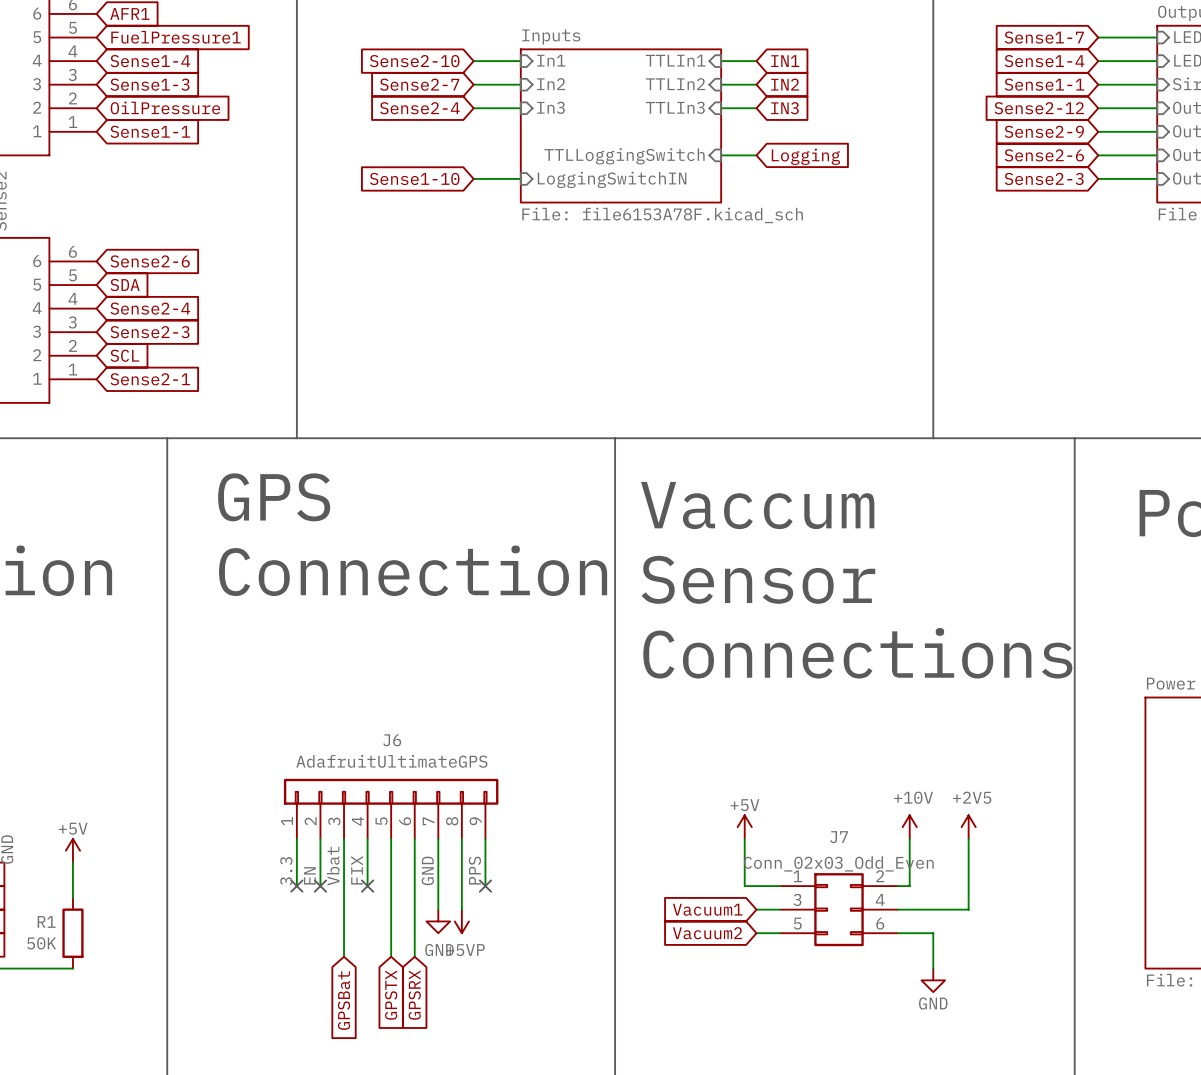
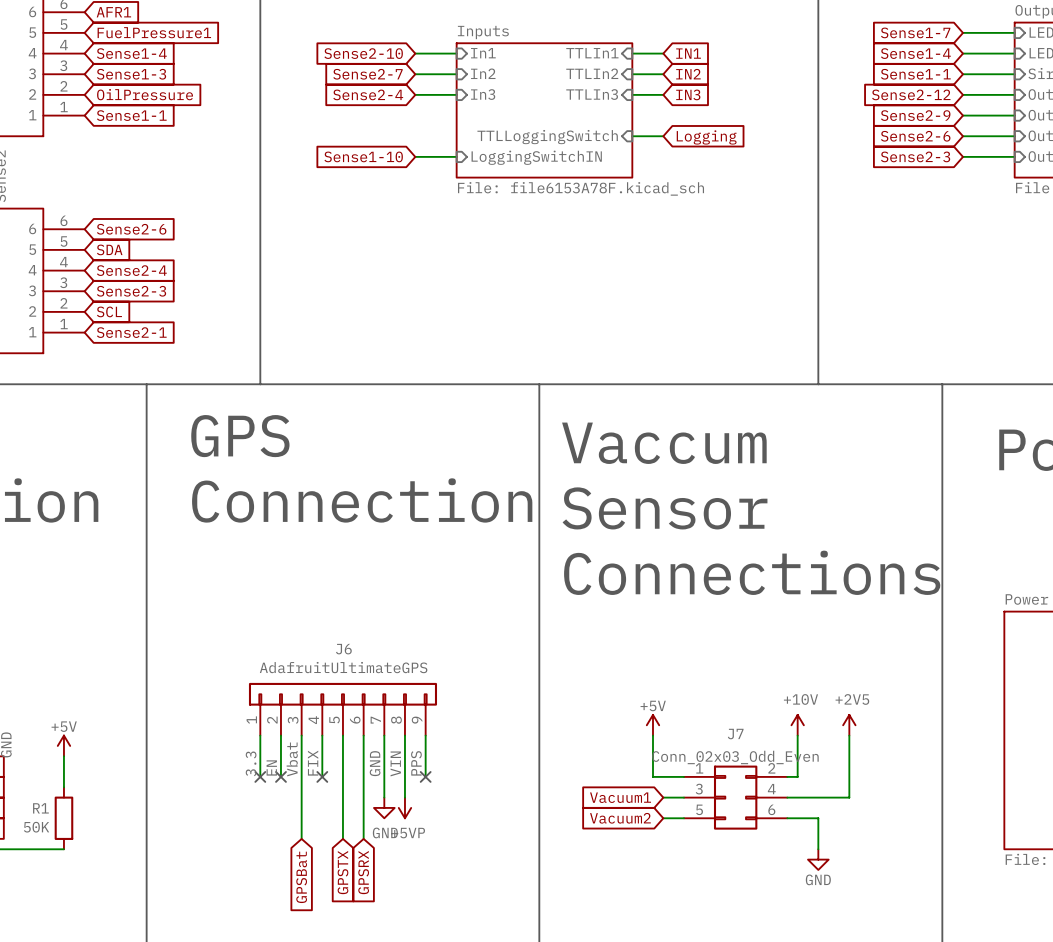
label: none -> VIN (395, 763)

